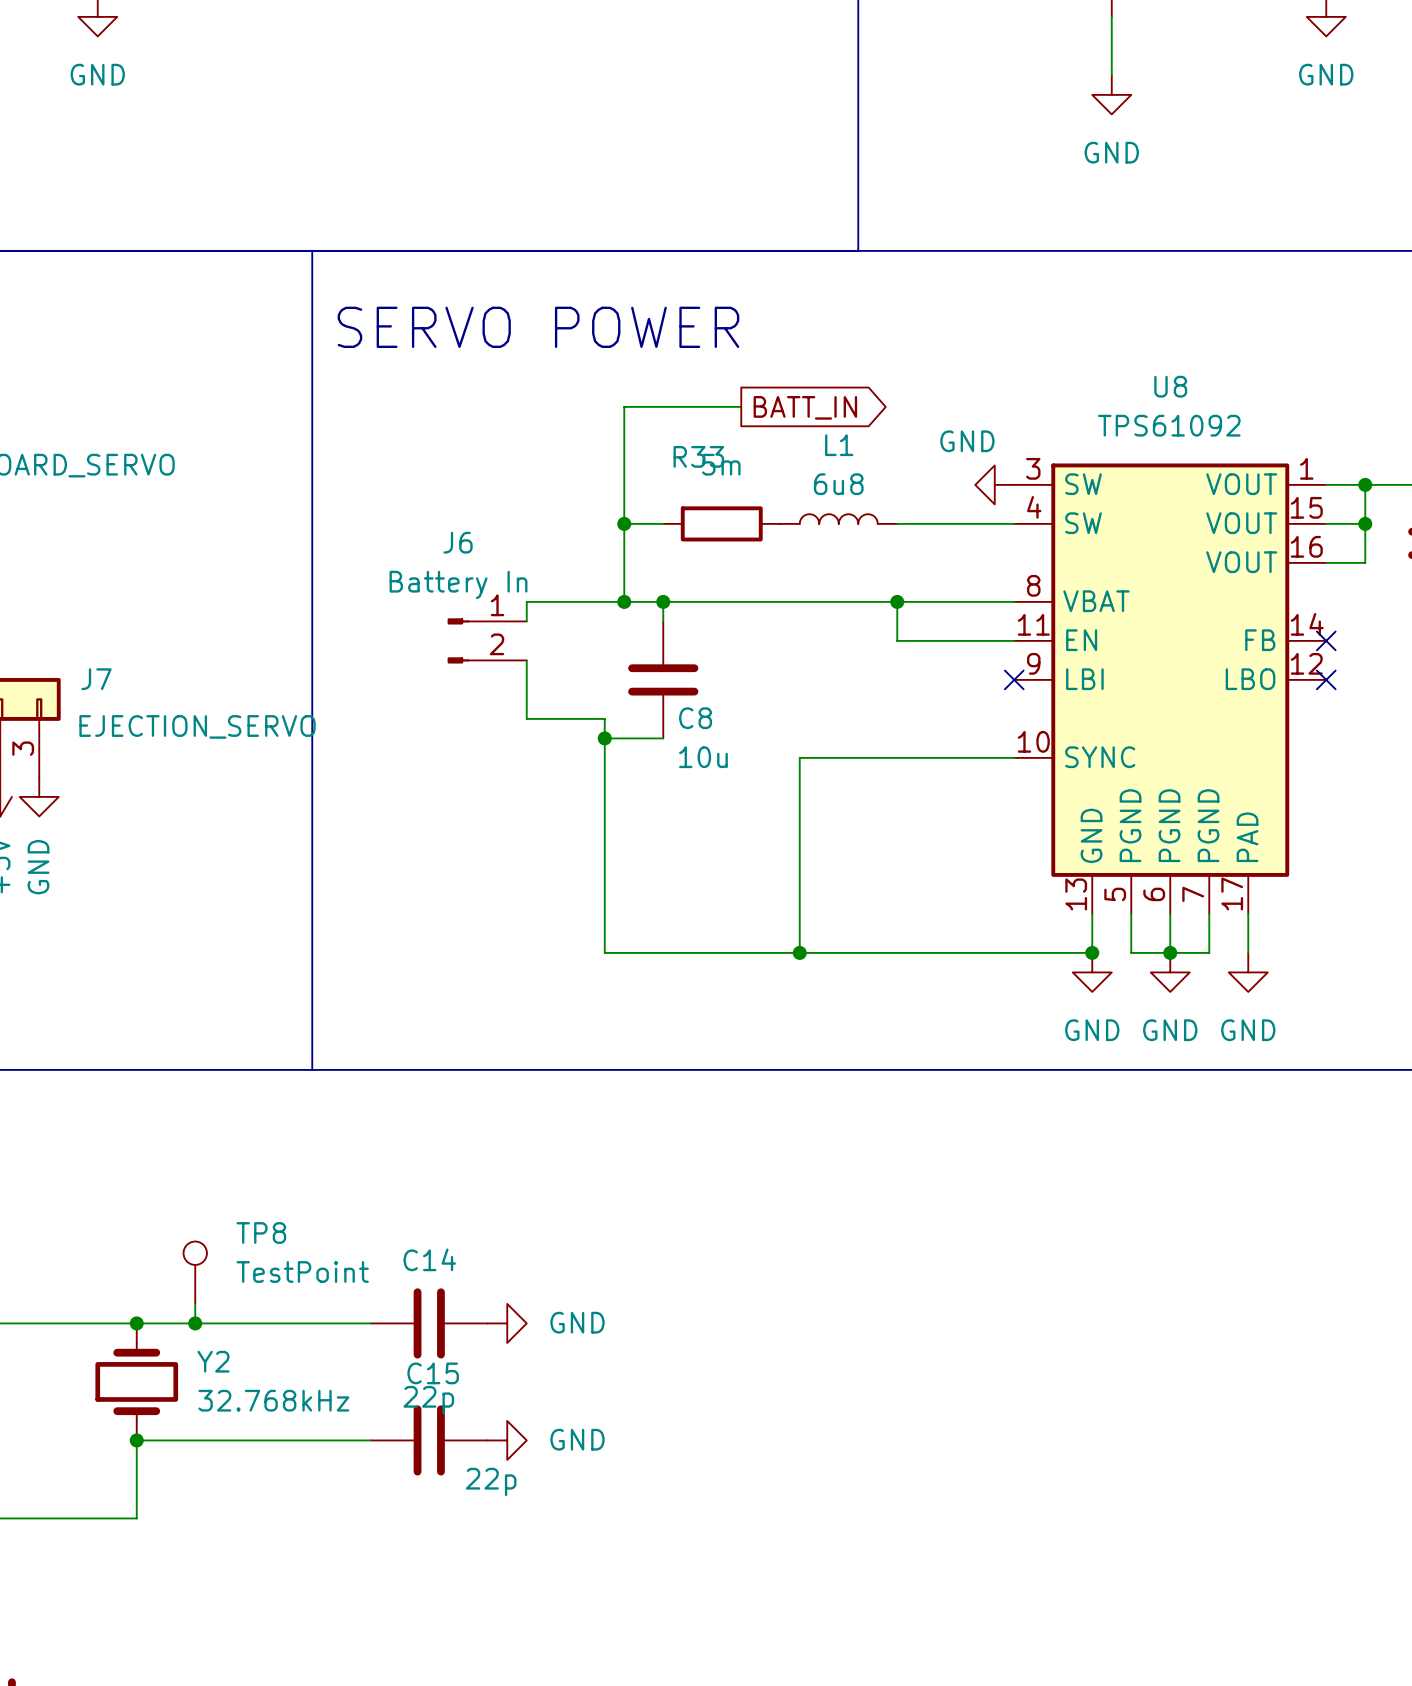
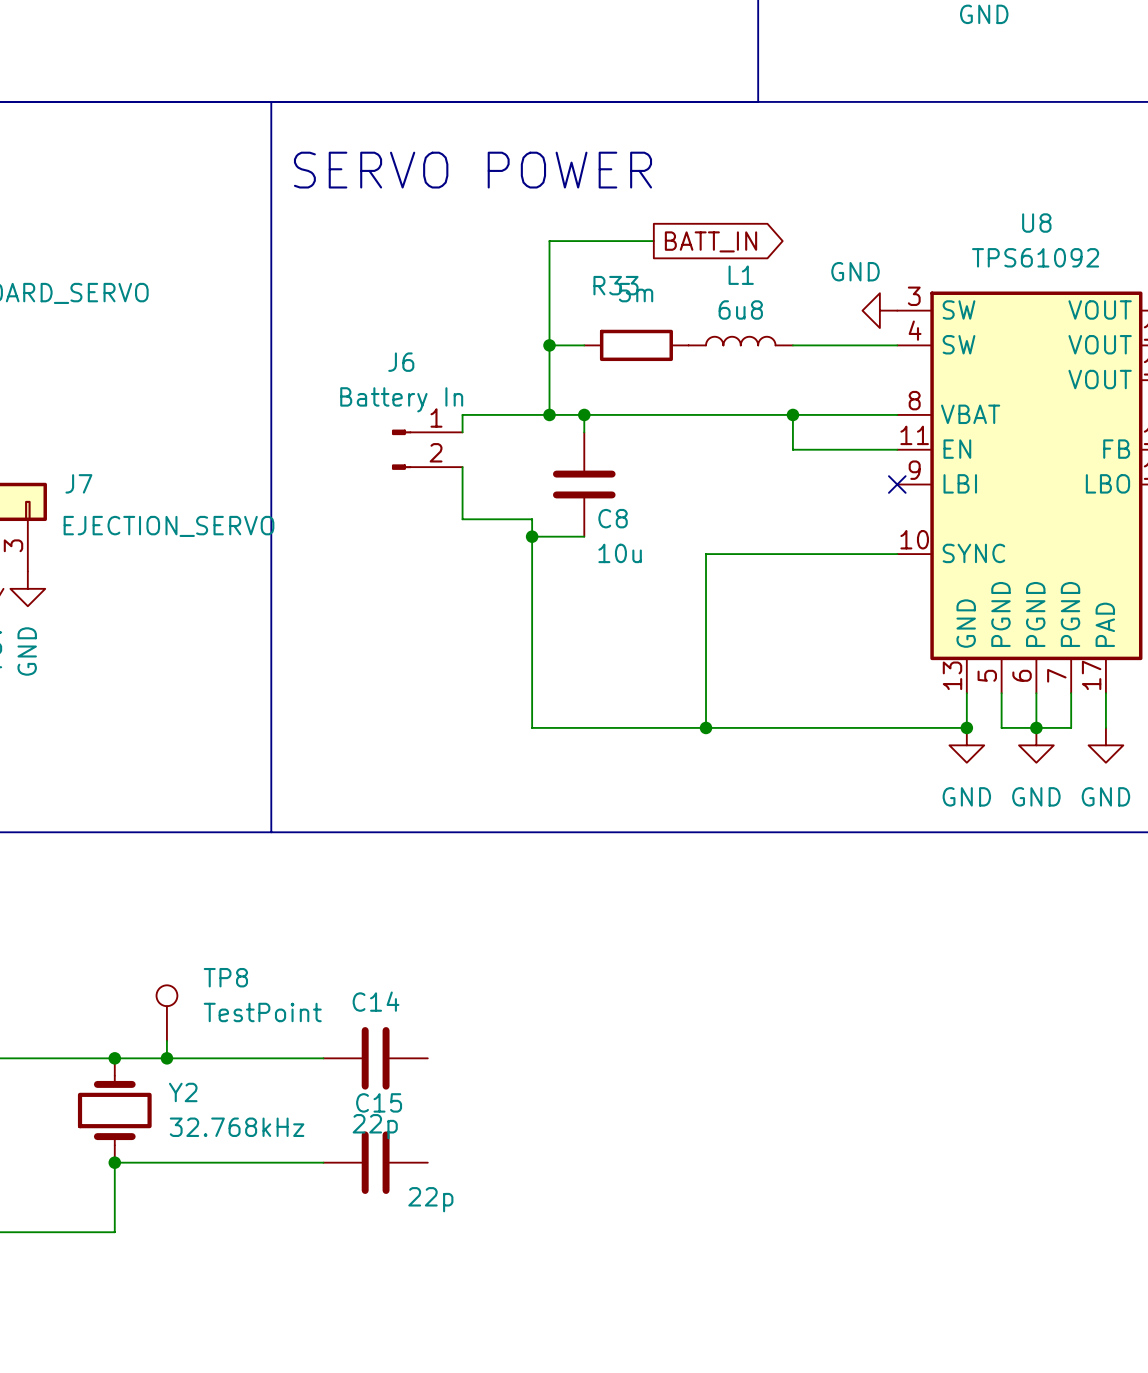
power symbol: GND (507, 1323) -> none
power symbol: GND (507, 1440) -> none

